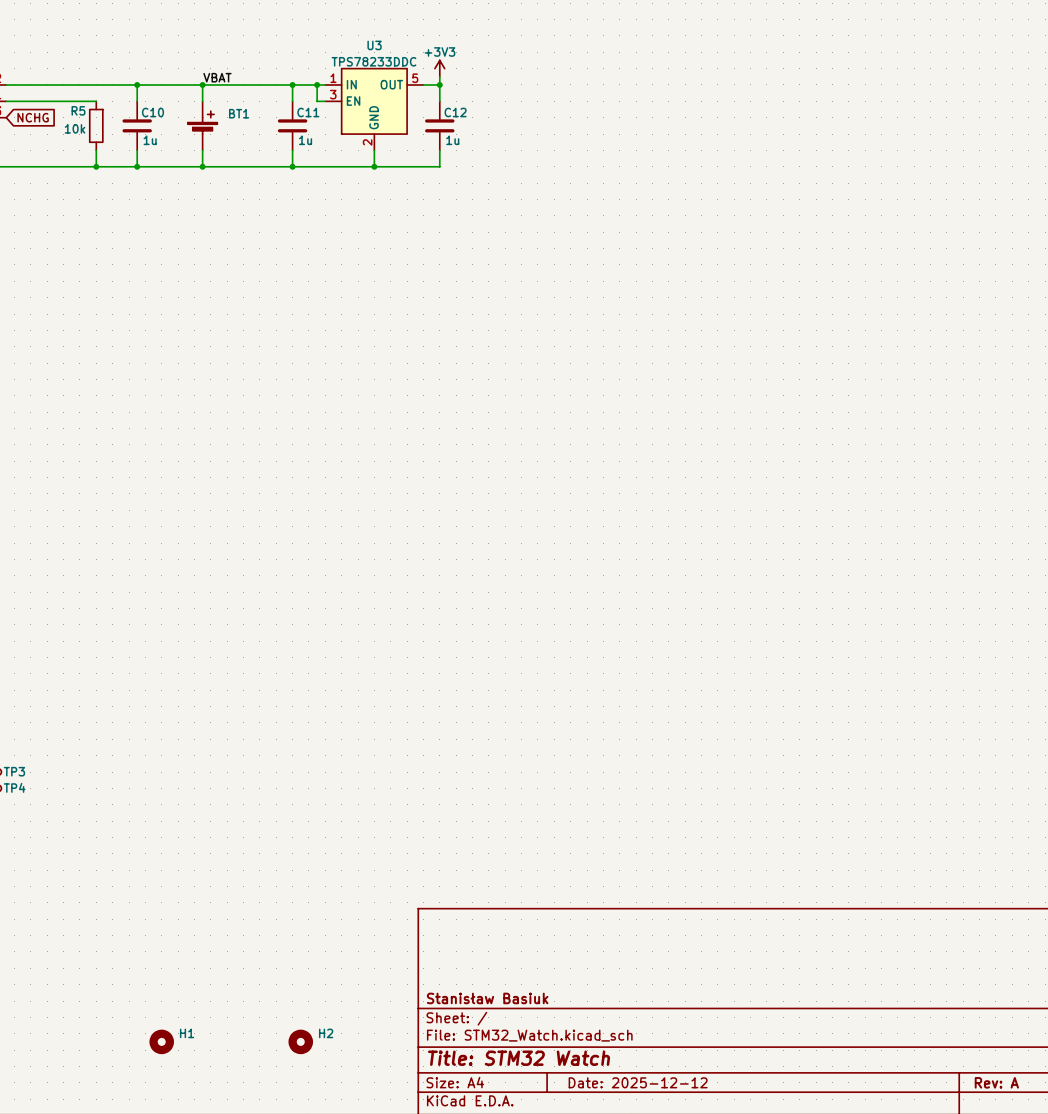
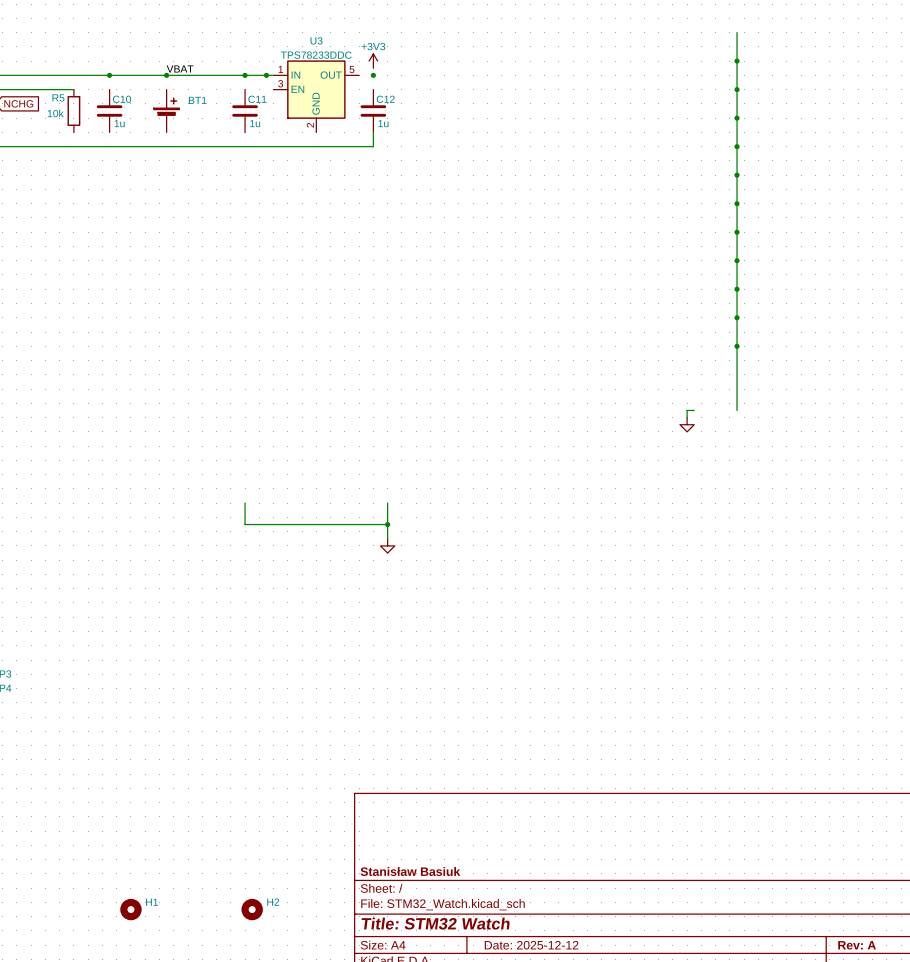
wire: none -> (737, 32) (737, 410)
junction: none -> (737, 61)
wire: (439, 76) (439, 101) -> none
wire: (137, 84) (137, 101) -> none
wire: (202, 84) (202, 101) -> none
wire: (292, 84) (292, 101) -> none
wire: (317, 84) (317, 101) (325, 101) -> none
wire: (423, 84) (439, 84) -> none
junction: none -> (737, 89)
junction: none -> (737, 118)
wire: (96, 150) (96, 166) -> none
wire: (137, 150) (137, 166) -> none
wire: (202, 150) (202, 166) -> none
wire: (292, 150) (292, 166) -> none
wire: (374, 150) (374, 166) -> none
junction: (96, 166) -> none
junction: (137, 166) -> none
junction: (202, 166) -> none
junction: (292, 166) -> none
junction: (374, 166) -> none
junction: none -> (737, 146)
junction: none -> (737, 175)
junction: none -> (737, 203)
junction: none -> (737, 232)
junction: none -> (737, 260)
junction: none -> (737, 289)
junction: none -> (737, 317)
junction: none -> (737, 346)
wire: none -> (694, 410) (687, 410) (687, 417)
power symbol: none -> (687, 424)
wire: none -> (245, 503) (245, 524) (387, 524)
wire: none -> (387, 503) (387, 538)
junction: none -> (387, 524)
power symbol: none -> (387, 545)

